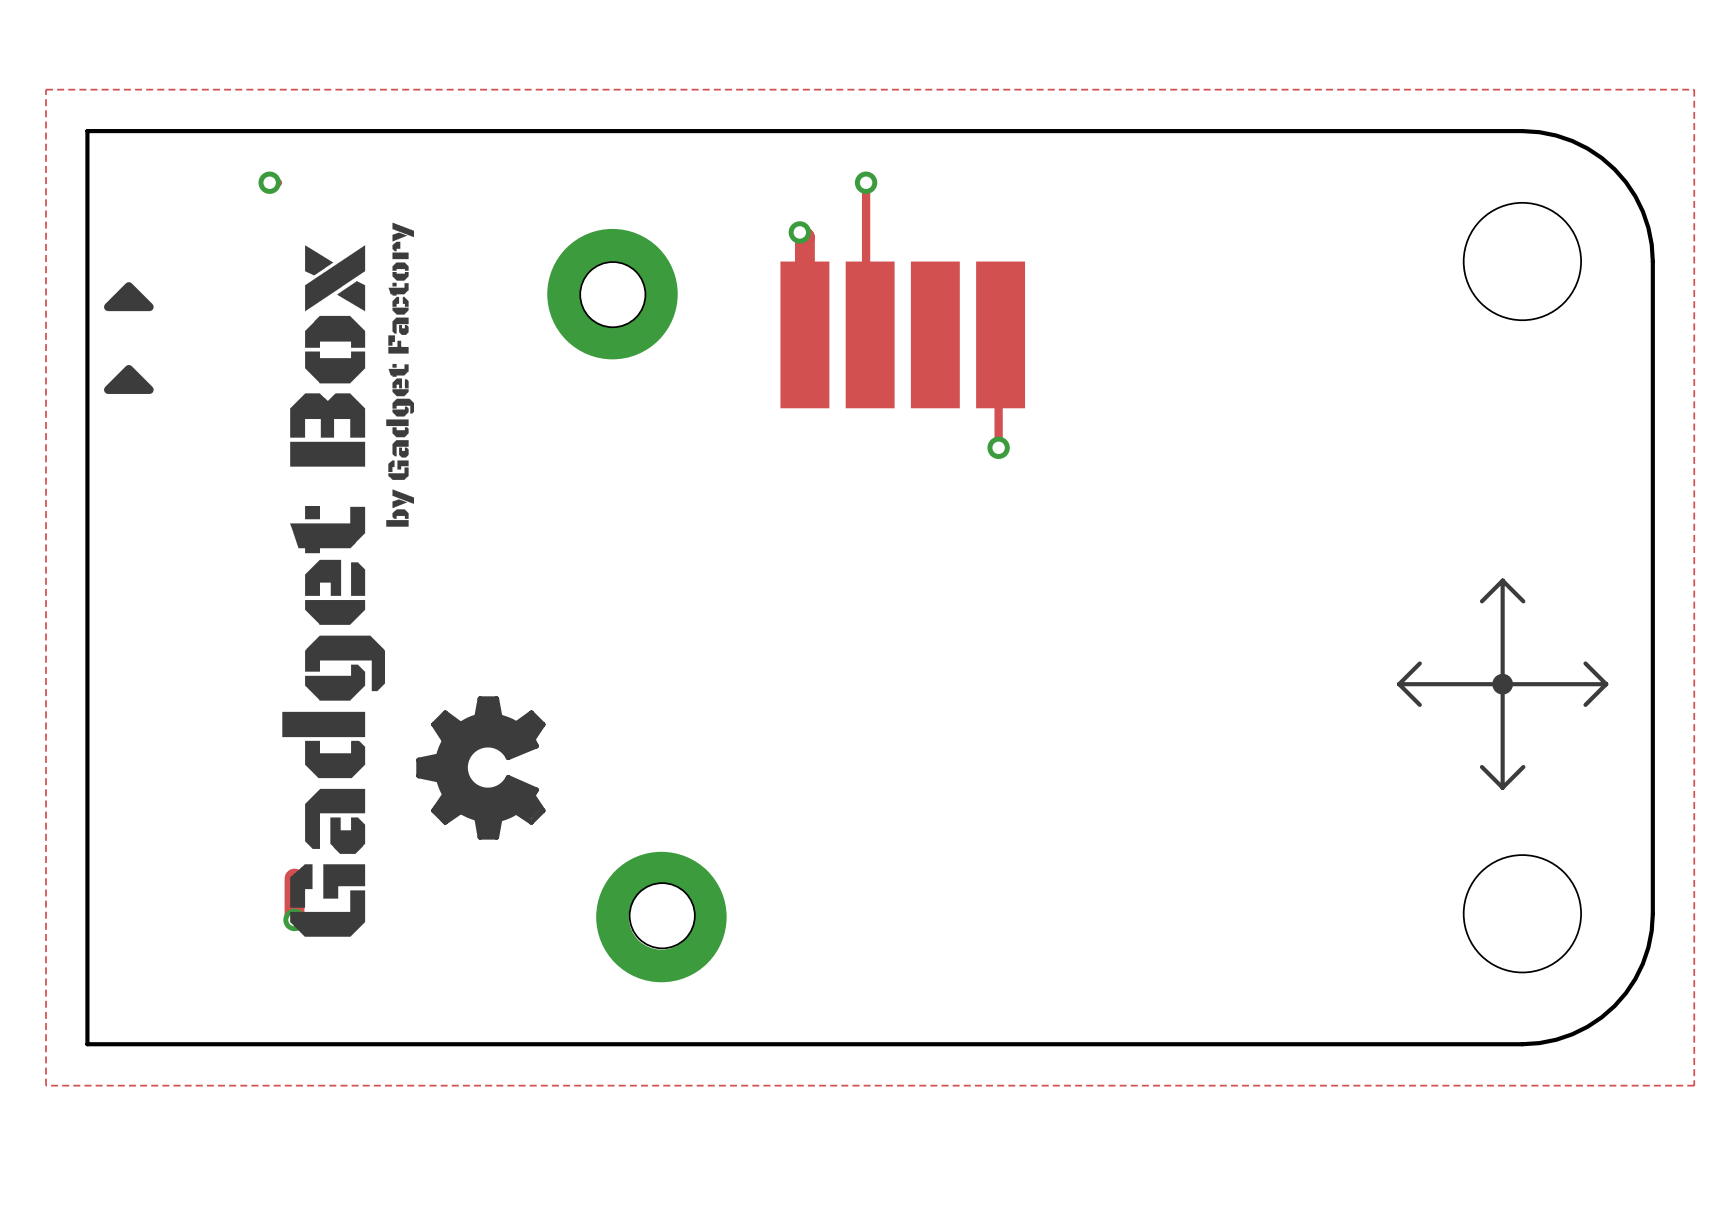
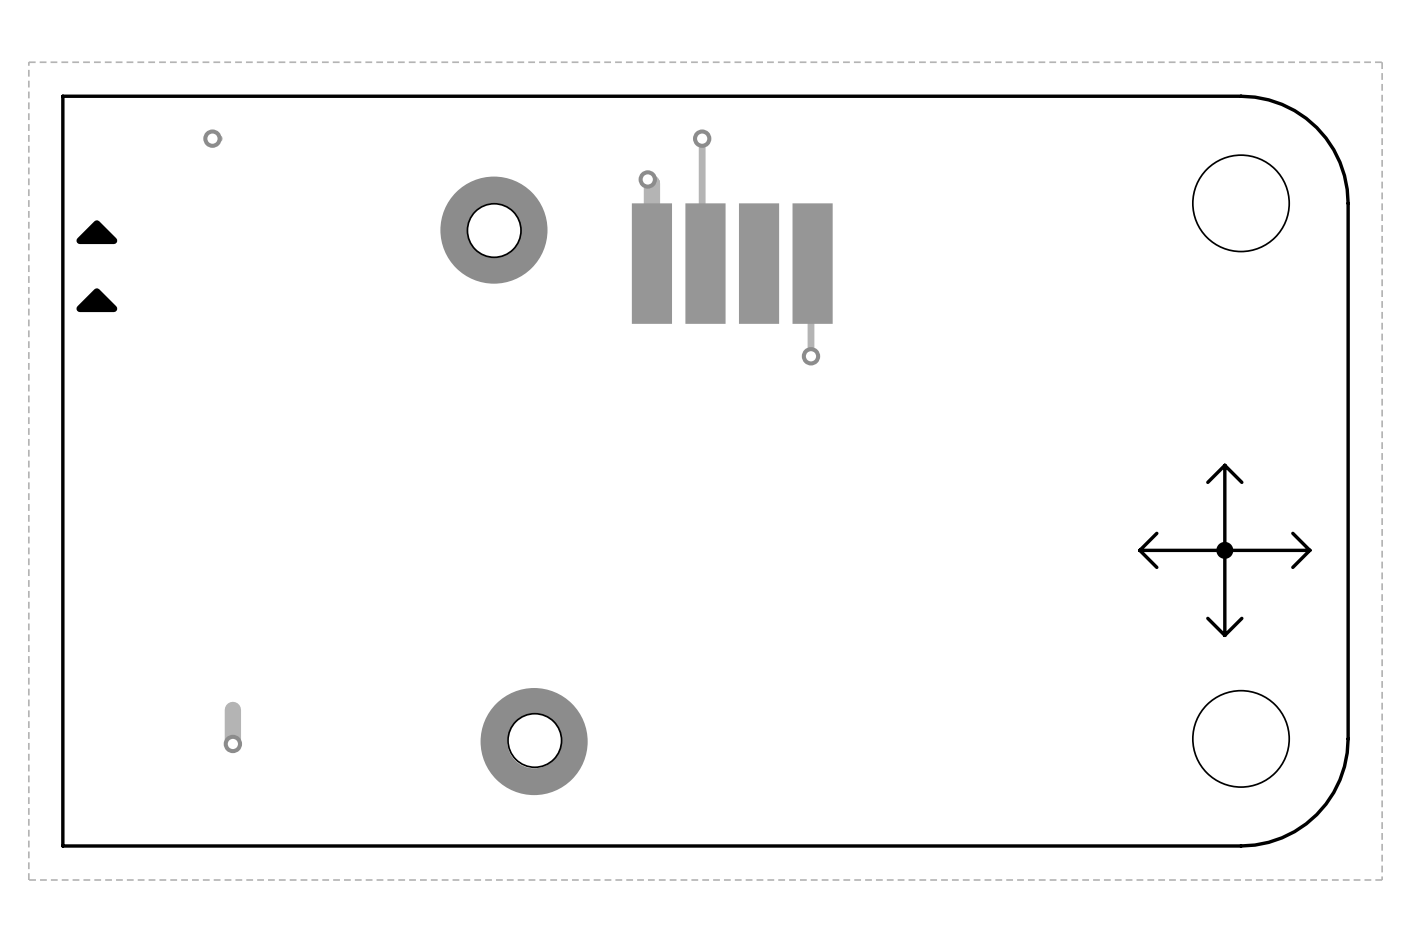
drawing: [282, 222, 546, 937] -> none

